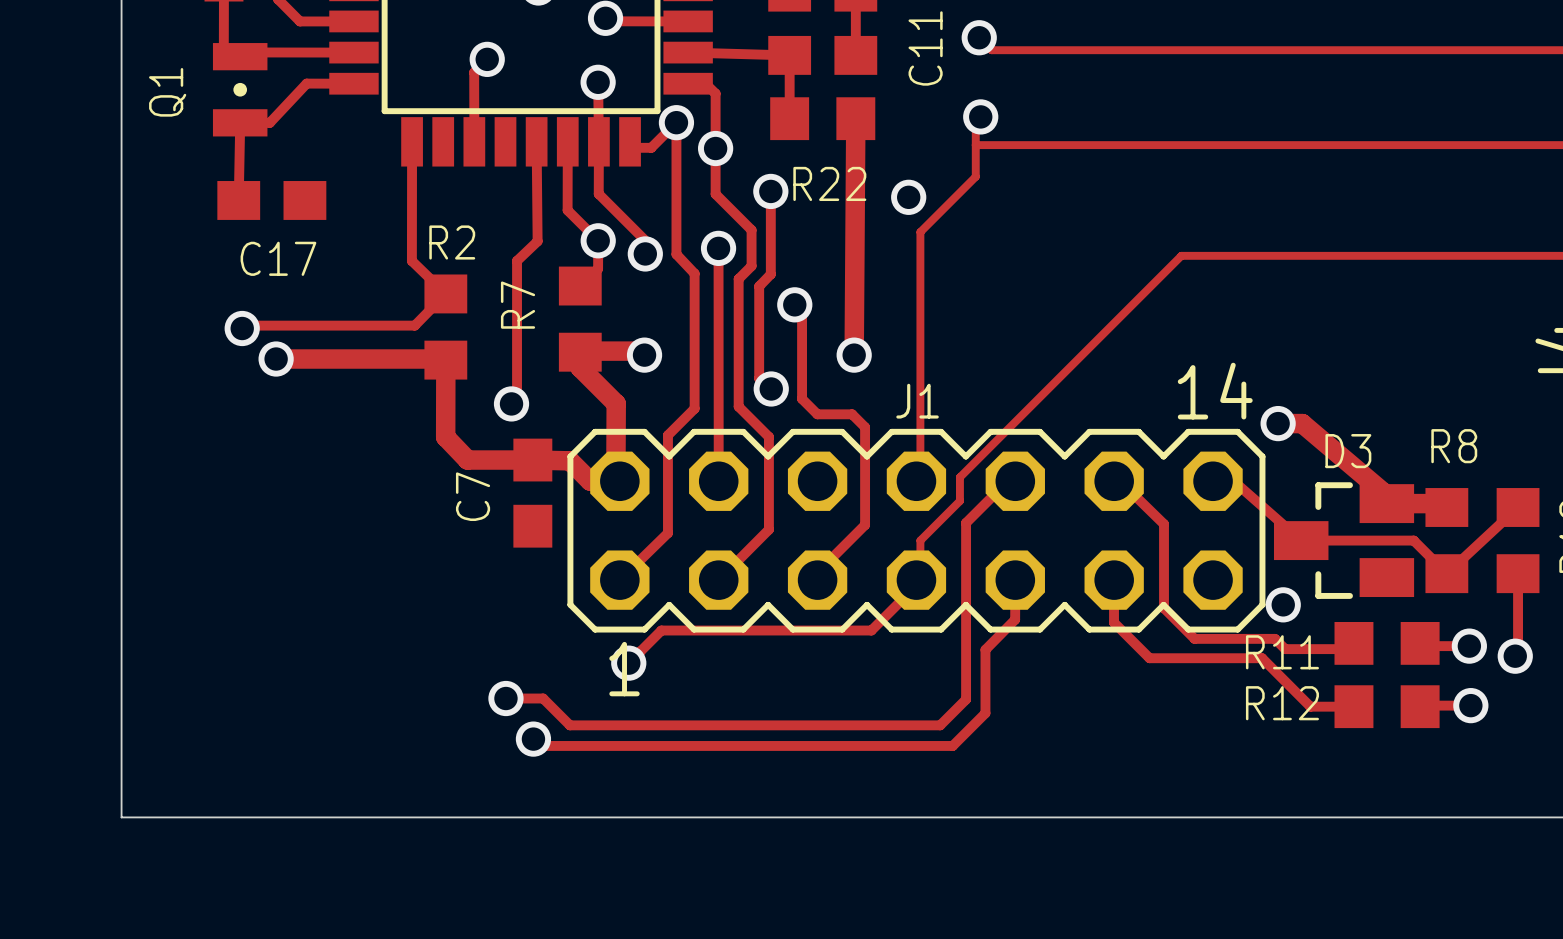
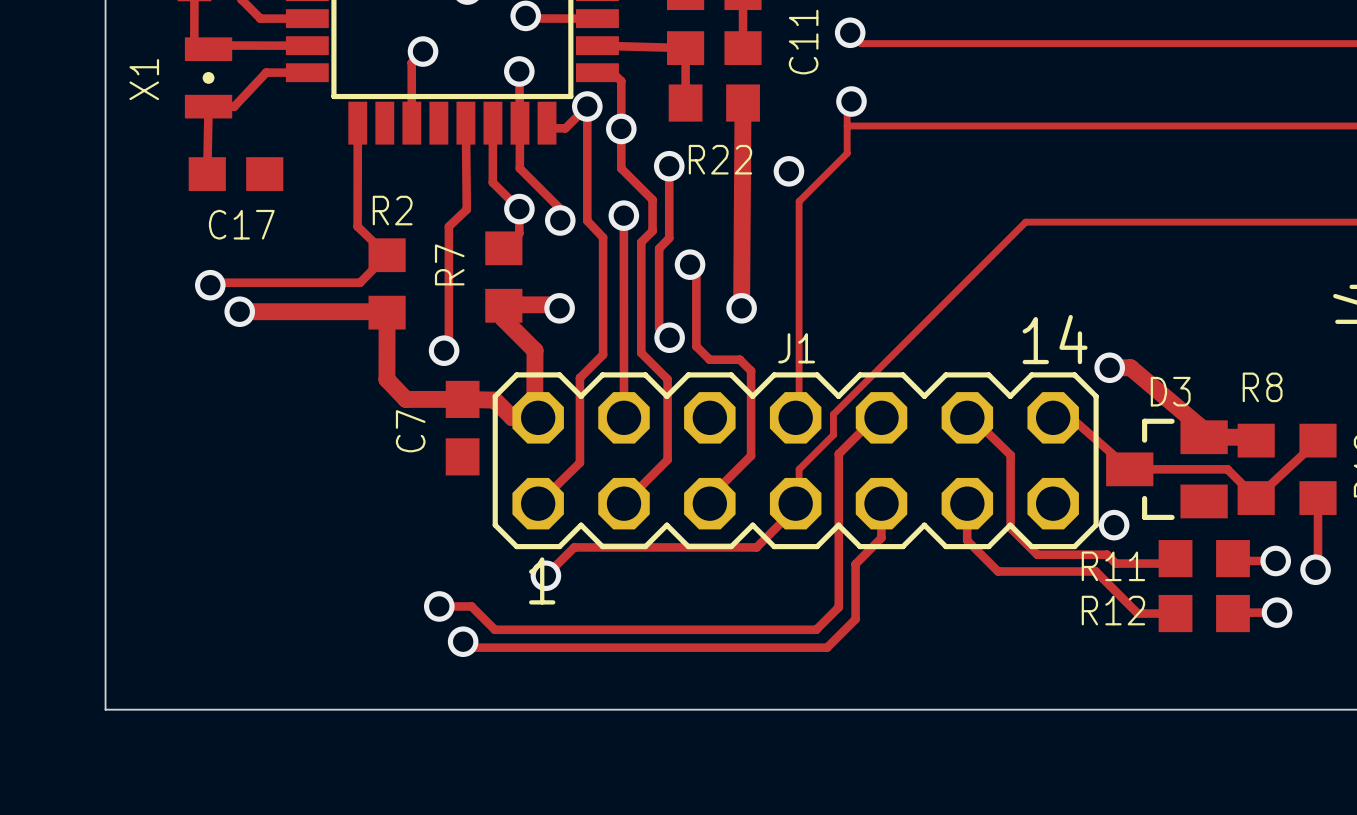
Q1 name: Q1 (167, 92) -> X1 (144, 79)

